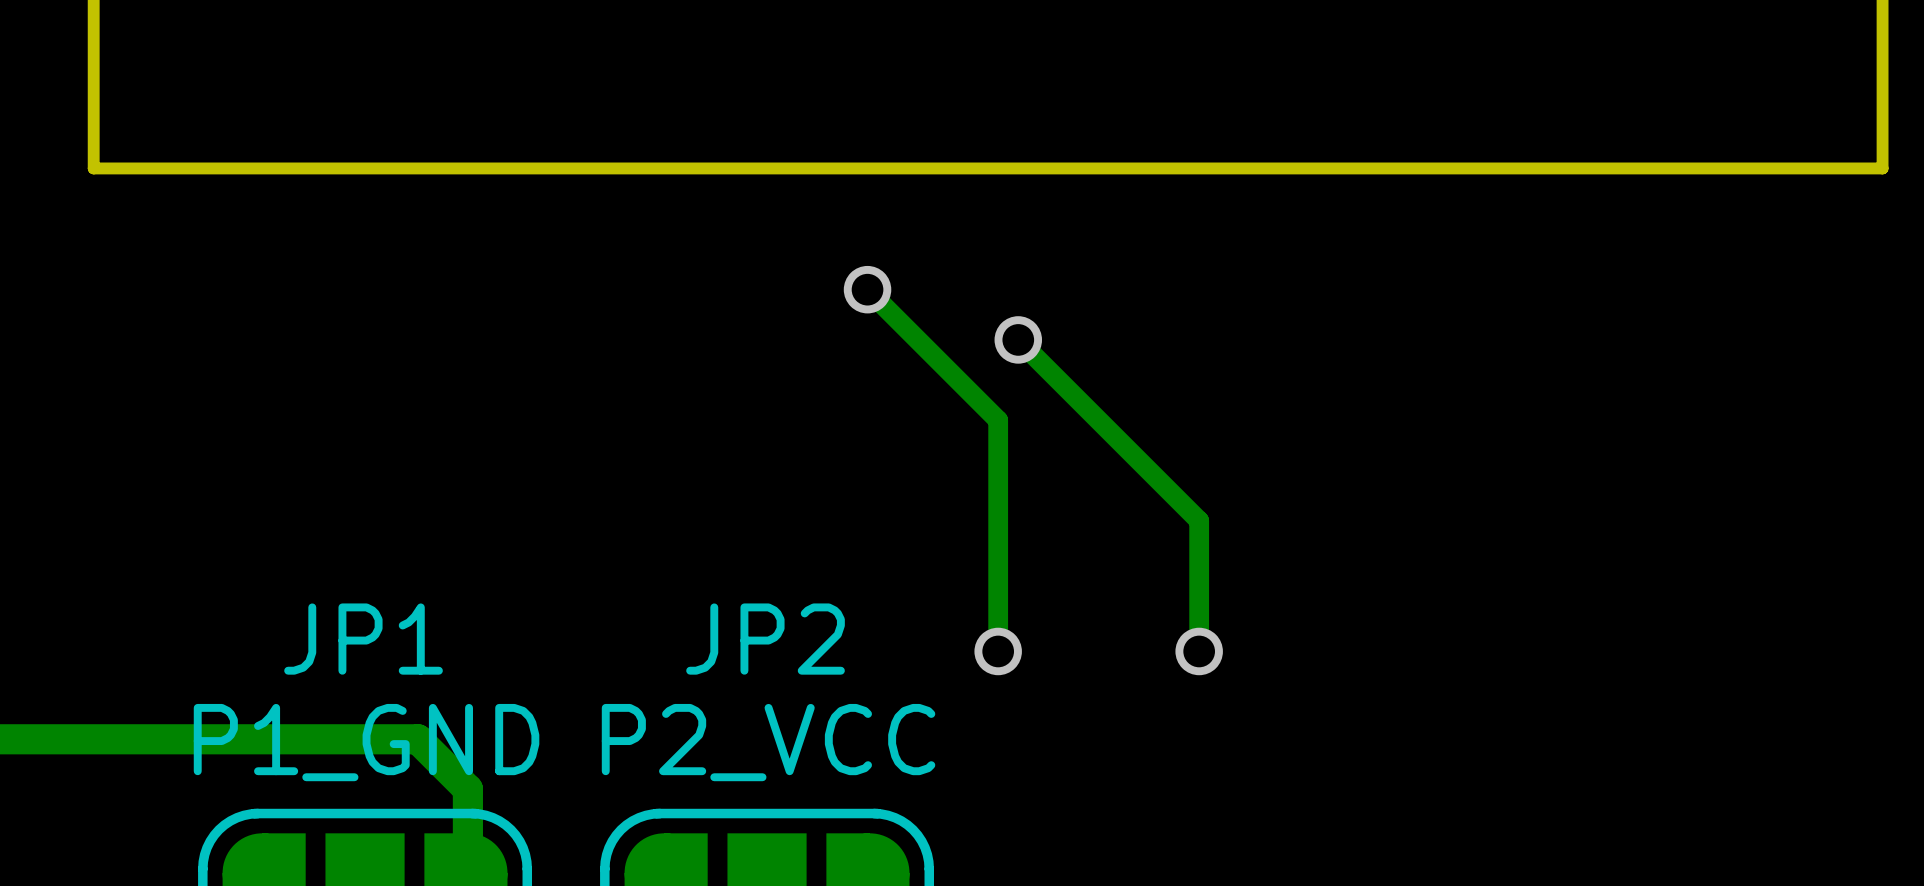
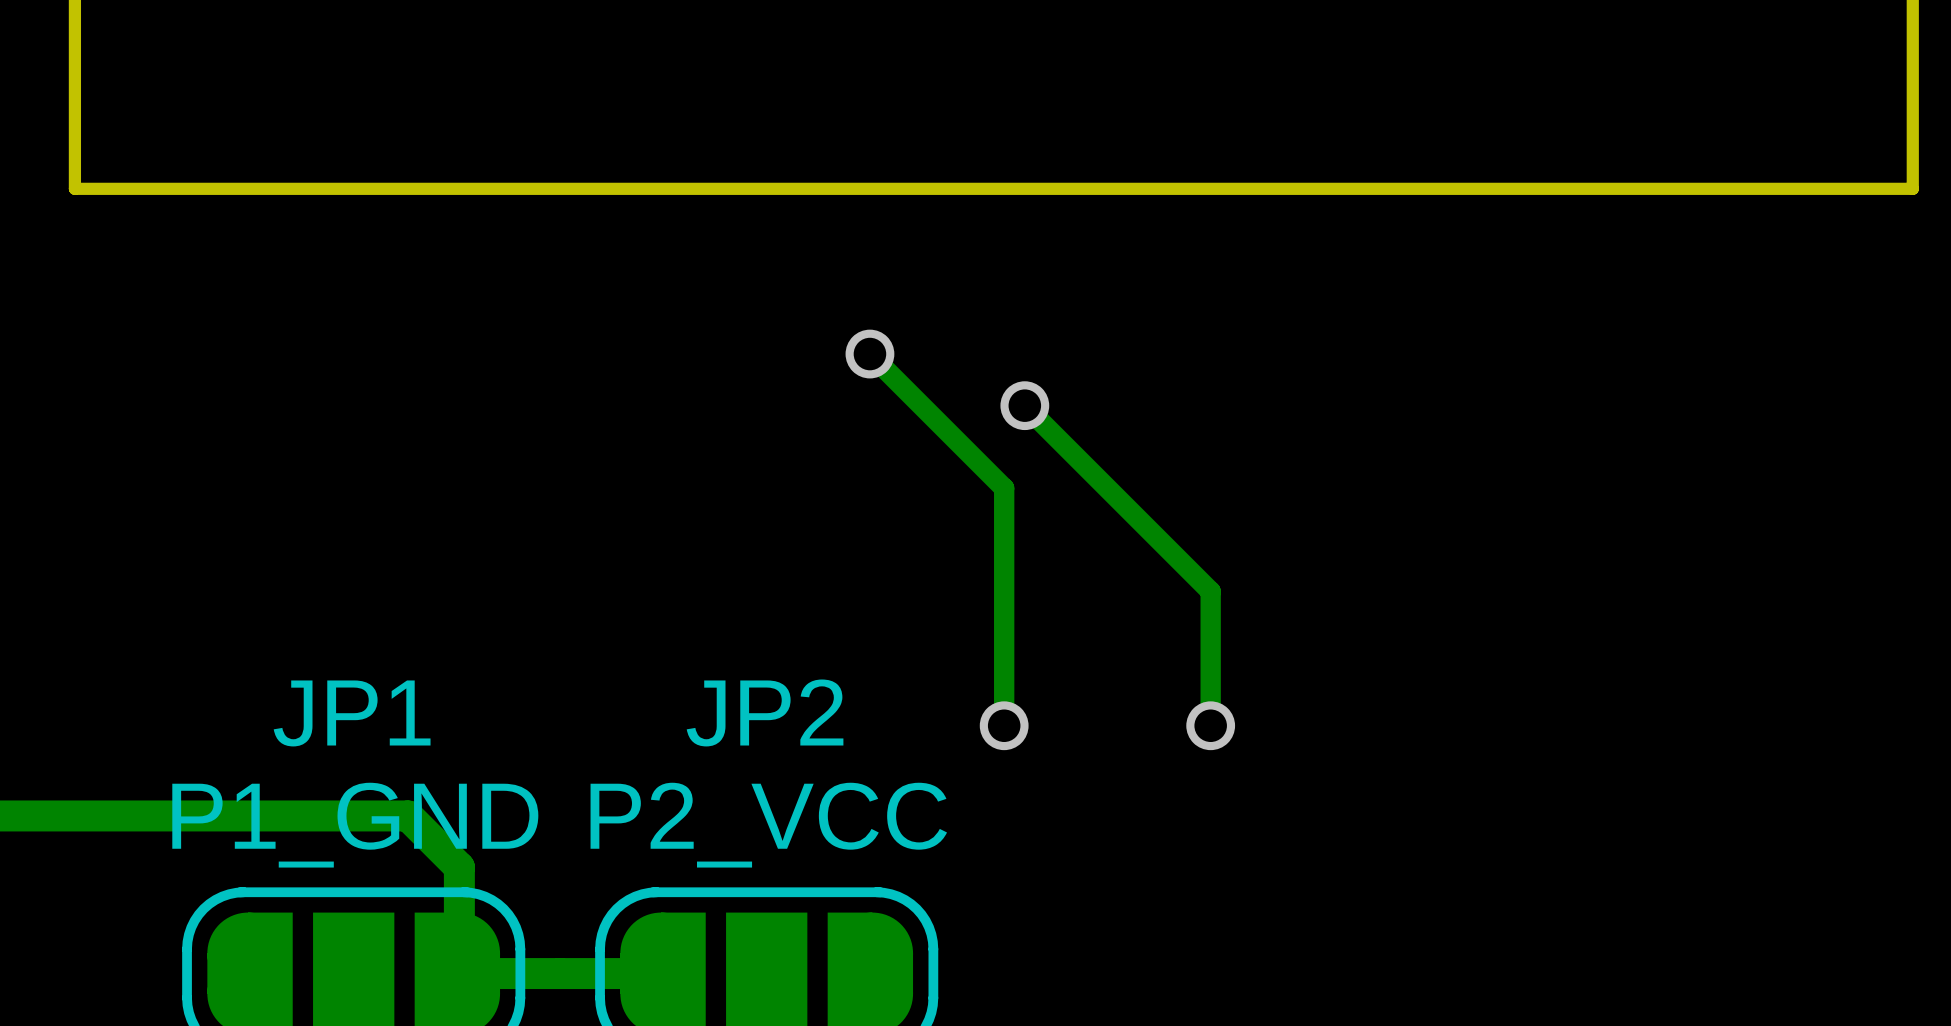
board edge: (1882, 128) (1882, 168) (93, 168) (93, 128) -> (1912, 188) (74, 188)

